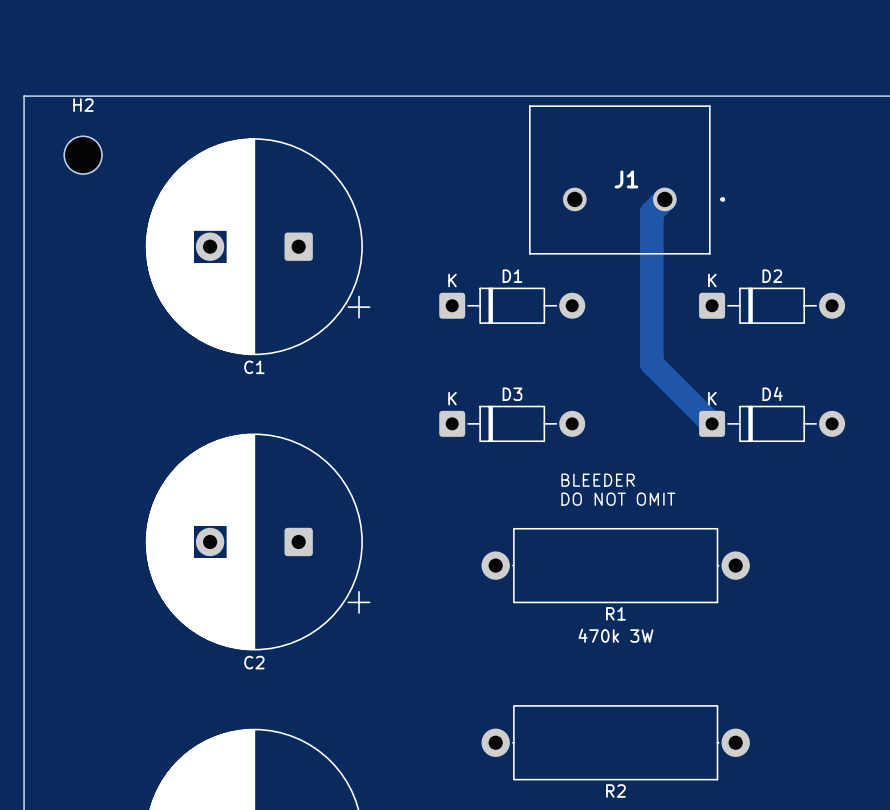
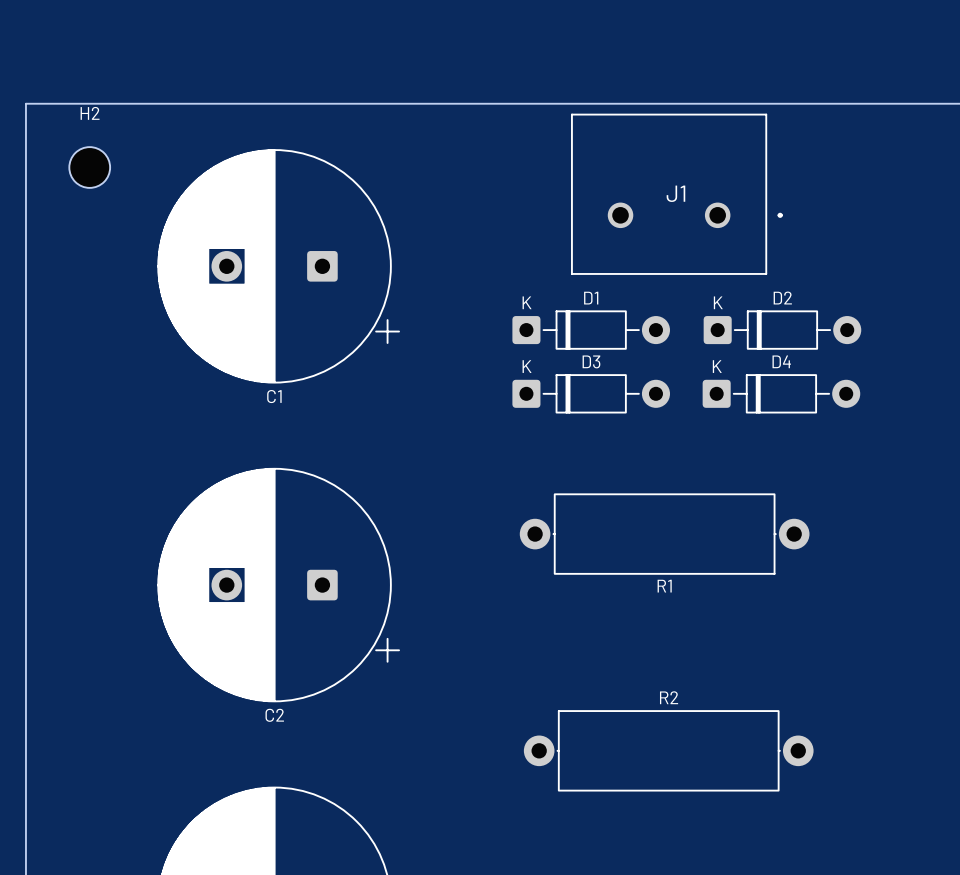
track: (664, 199) (651, 212) (651, 363) (712, 423) -> none
D1 position: (512, 305) -> (591, 330)
D2 position: (772, 305) -> (782, 330)
D3 position: (512, 423) -> (591, 393)
D4 position: (772, 423) -> (781, 393)
text: BLEEDER (598, 480) -> none
text: DO NOT OMIT (618, 499) -> none
R1 position: (615, 565) -> (664, 534)
R1 value: 470k 3W (615, 635) -> none
R2 position: (615, 742) -> (668, 750)
R2 name position: R2 (615, 790) -> R2 (669, 697)

